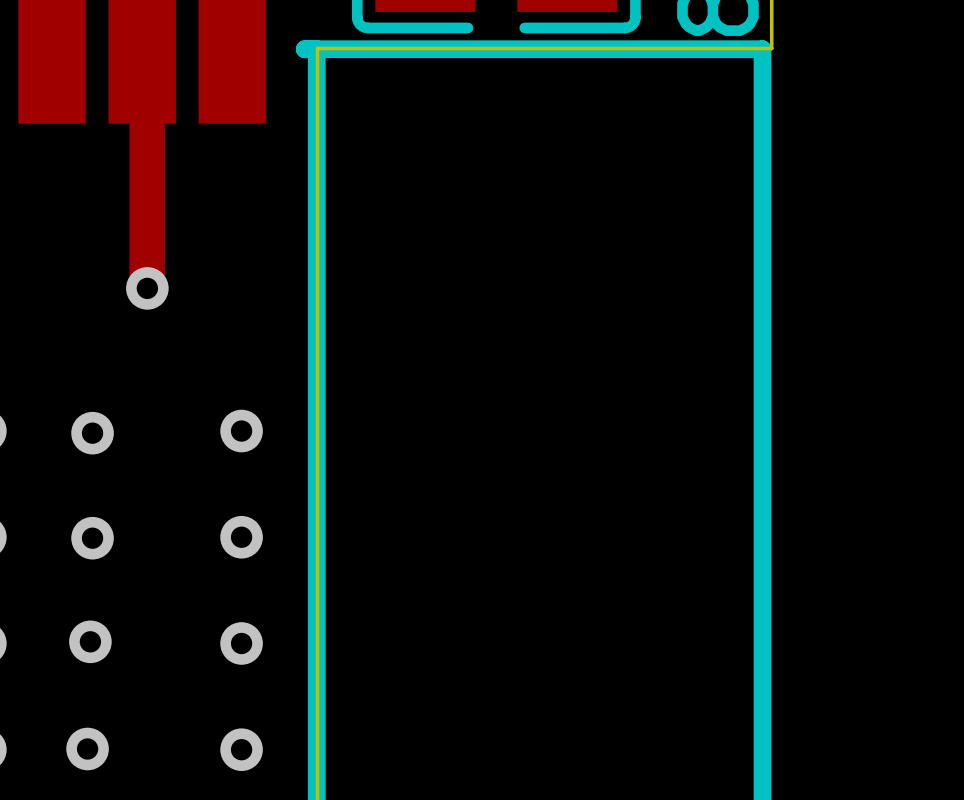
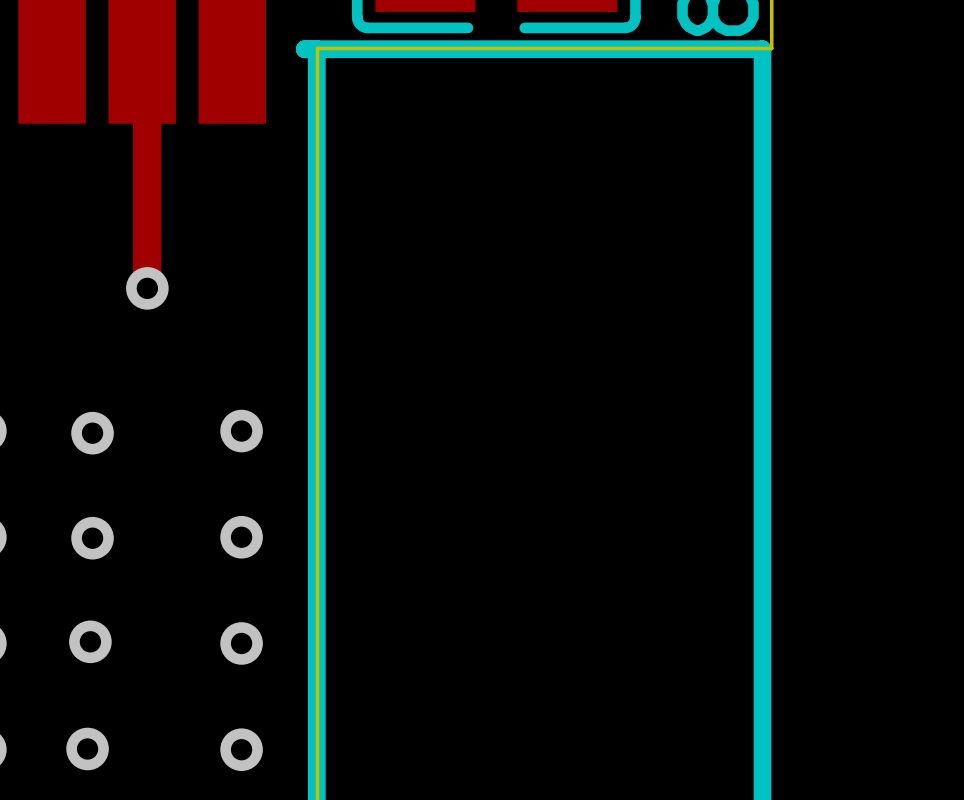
track width: thick (147, 81) (147, 288) -> thin (147, 81) (147, 288)

